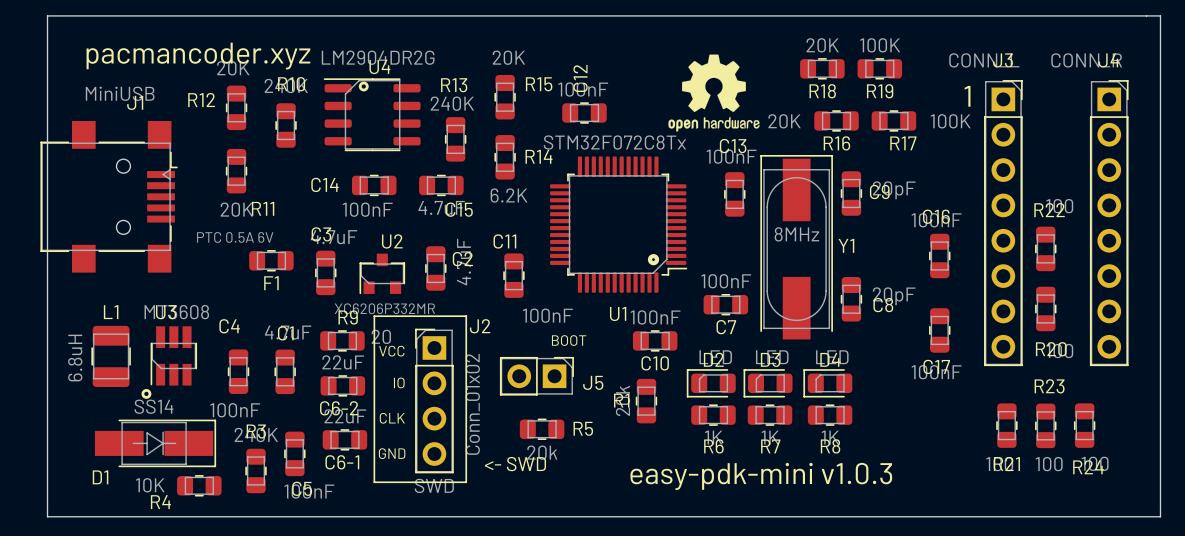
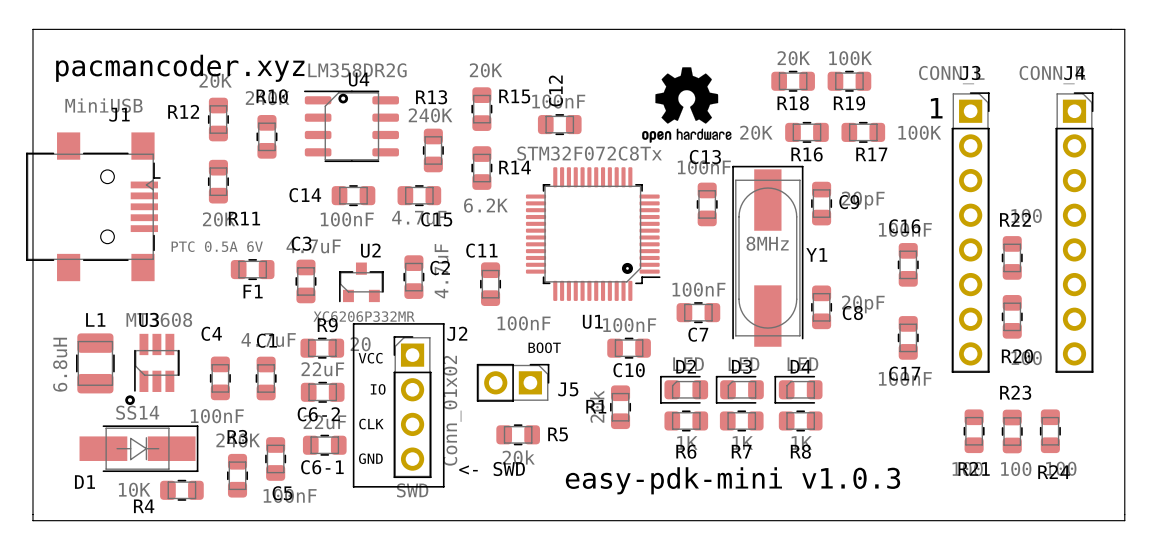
U4 value: LM2904DR2G (378, 57) -> LM358DR2G (357, 70)

